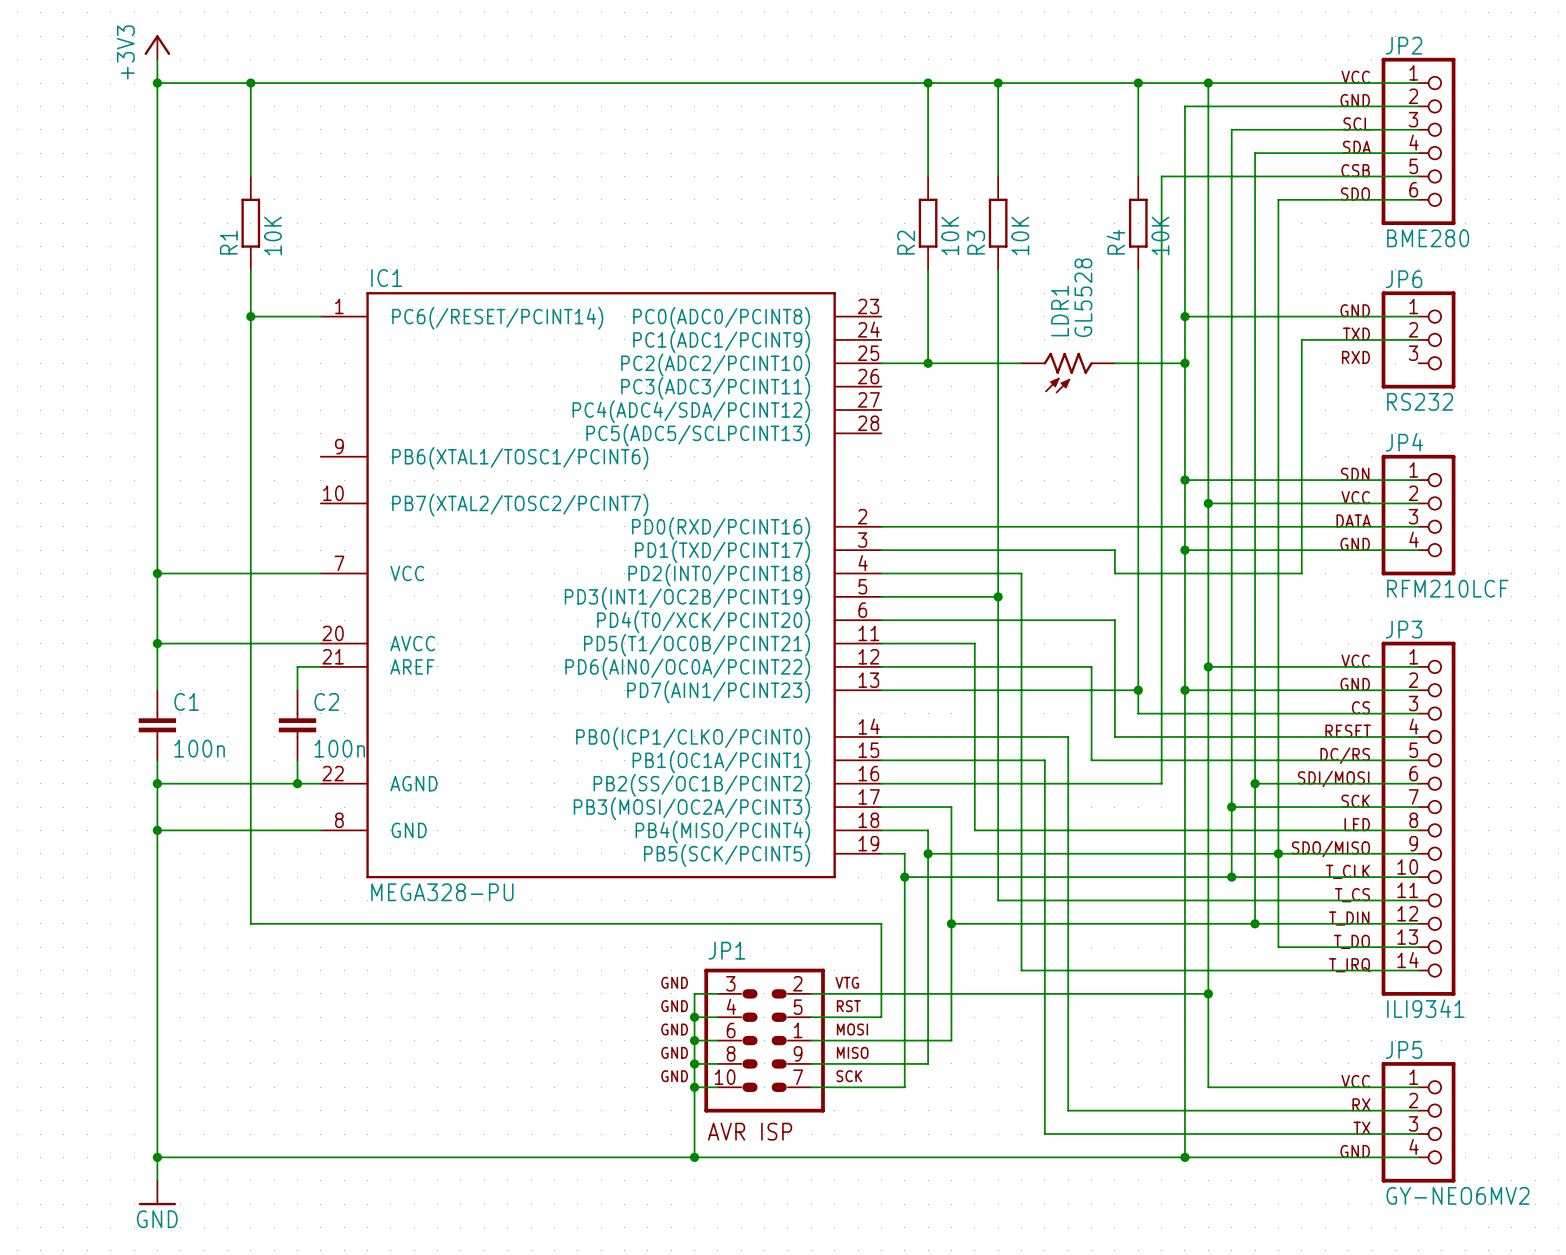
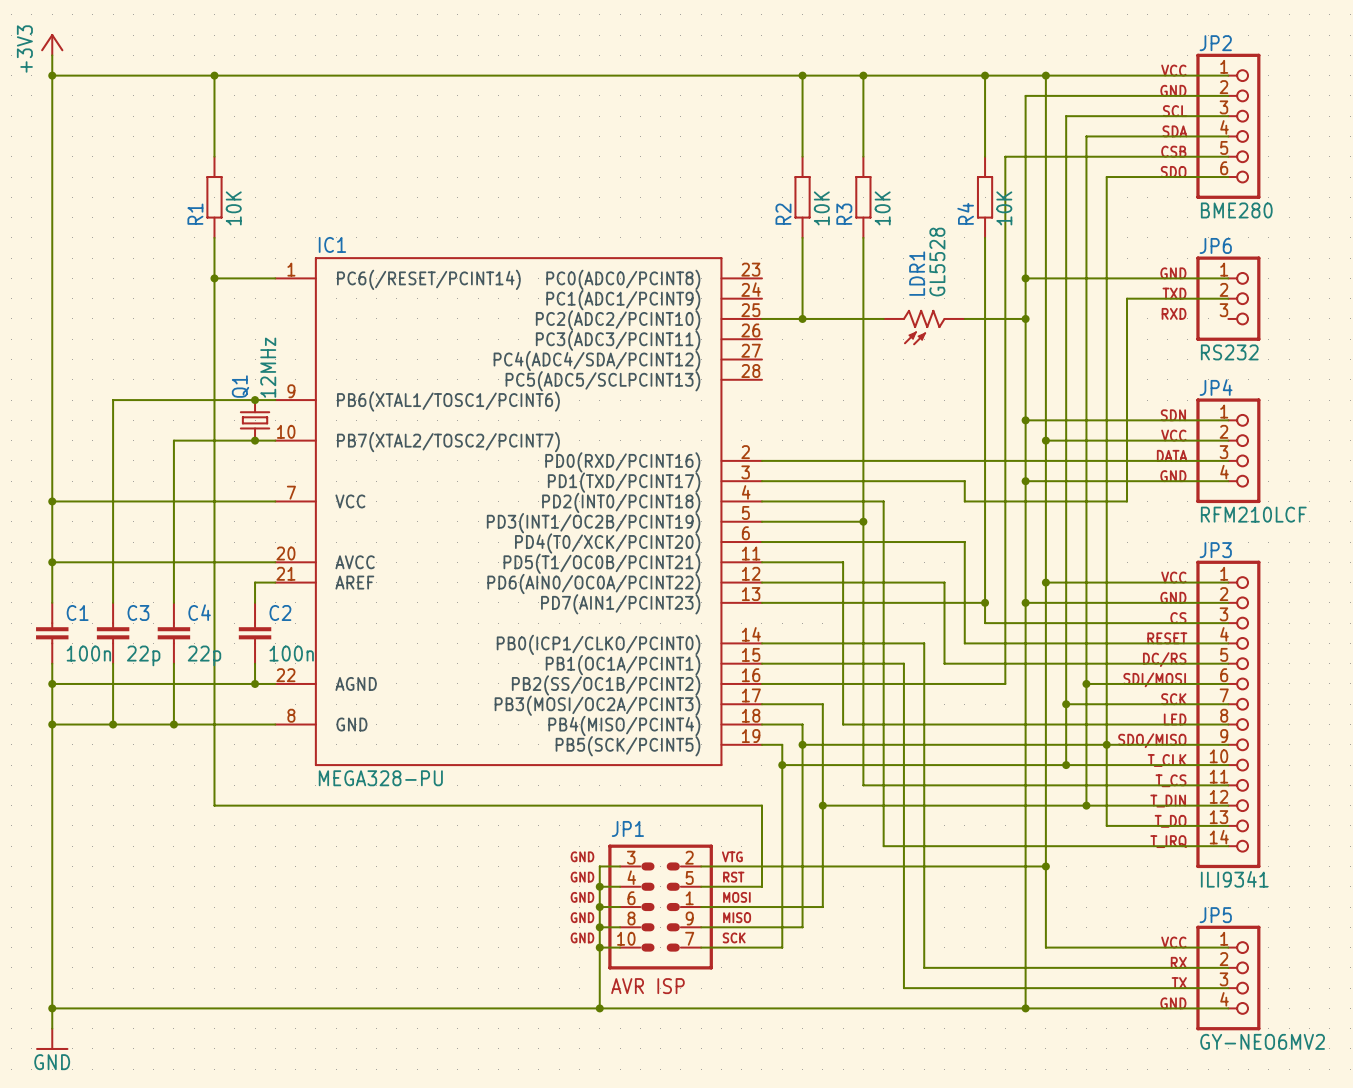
power symbol position: +3V3 (157, 47) -> +3V3 (52, 44)
wire: (157, 59) (157, 690) -> (52, 55) (52, 602)
wire: none -> (52, 75) (133, 75)
junction: none -> (52, 75)
junction: (157, 83) -> none
junction: none -> (255, 400)
wire: none -> (275, 400) (113, 400) (113, 602)
Q1: none -> 12MHz (255, 420)
junction: none -> (255, 440)
wire: none -> (275, 440) (173, 440) (173, 602)
wire: none -> (52, 501) (133, 501)
junction: none -> (52, 501)
junction: (157, 573) -> none
wire: none -> (52, 562) (133, 562)
junction: none -> (52, 562)
junction: (157, 643) -> none
C3: none -> 22p (113, 633)
C1 position: (157, 725) -> (52, 633)
C4: none -> 22p (173, 633)
wire: none -> (113, 663) (113, 724)
wire: (157, 760) (157, 1180) -> (52, 663) (52, 1028)
wire: none -> (173, 663) (173, 724)
wire: none -> (52, 683) (133, 683)
junction: none -> (52, 683)
junction: (157, 783) -> none
wire: none -> (52, 724) (133, 724)
junction: none -> (52, 724)
junction: none -> (113, 724)
junction: (157, 830) -> none
junction: none -> (173, 724)
wire: none -> (52, 1008) (133, 1008)
junction: none -> (52, 1008)
junction: (157, 1157) -> none
power symbol position: GND (157, 1192) -> GND (52, 1039)

